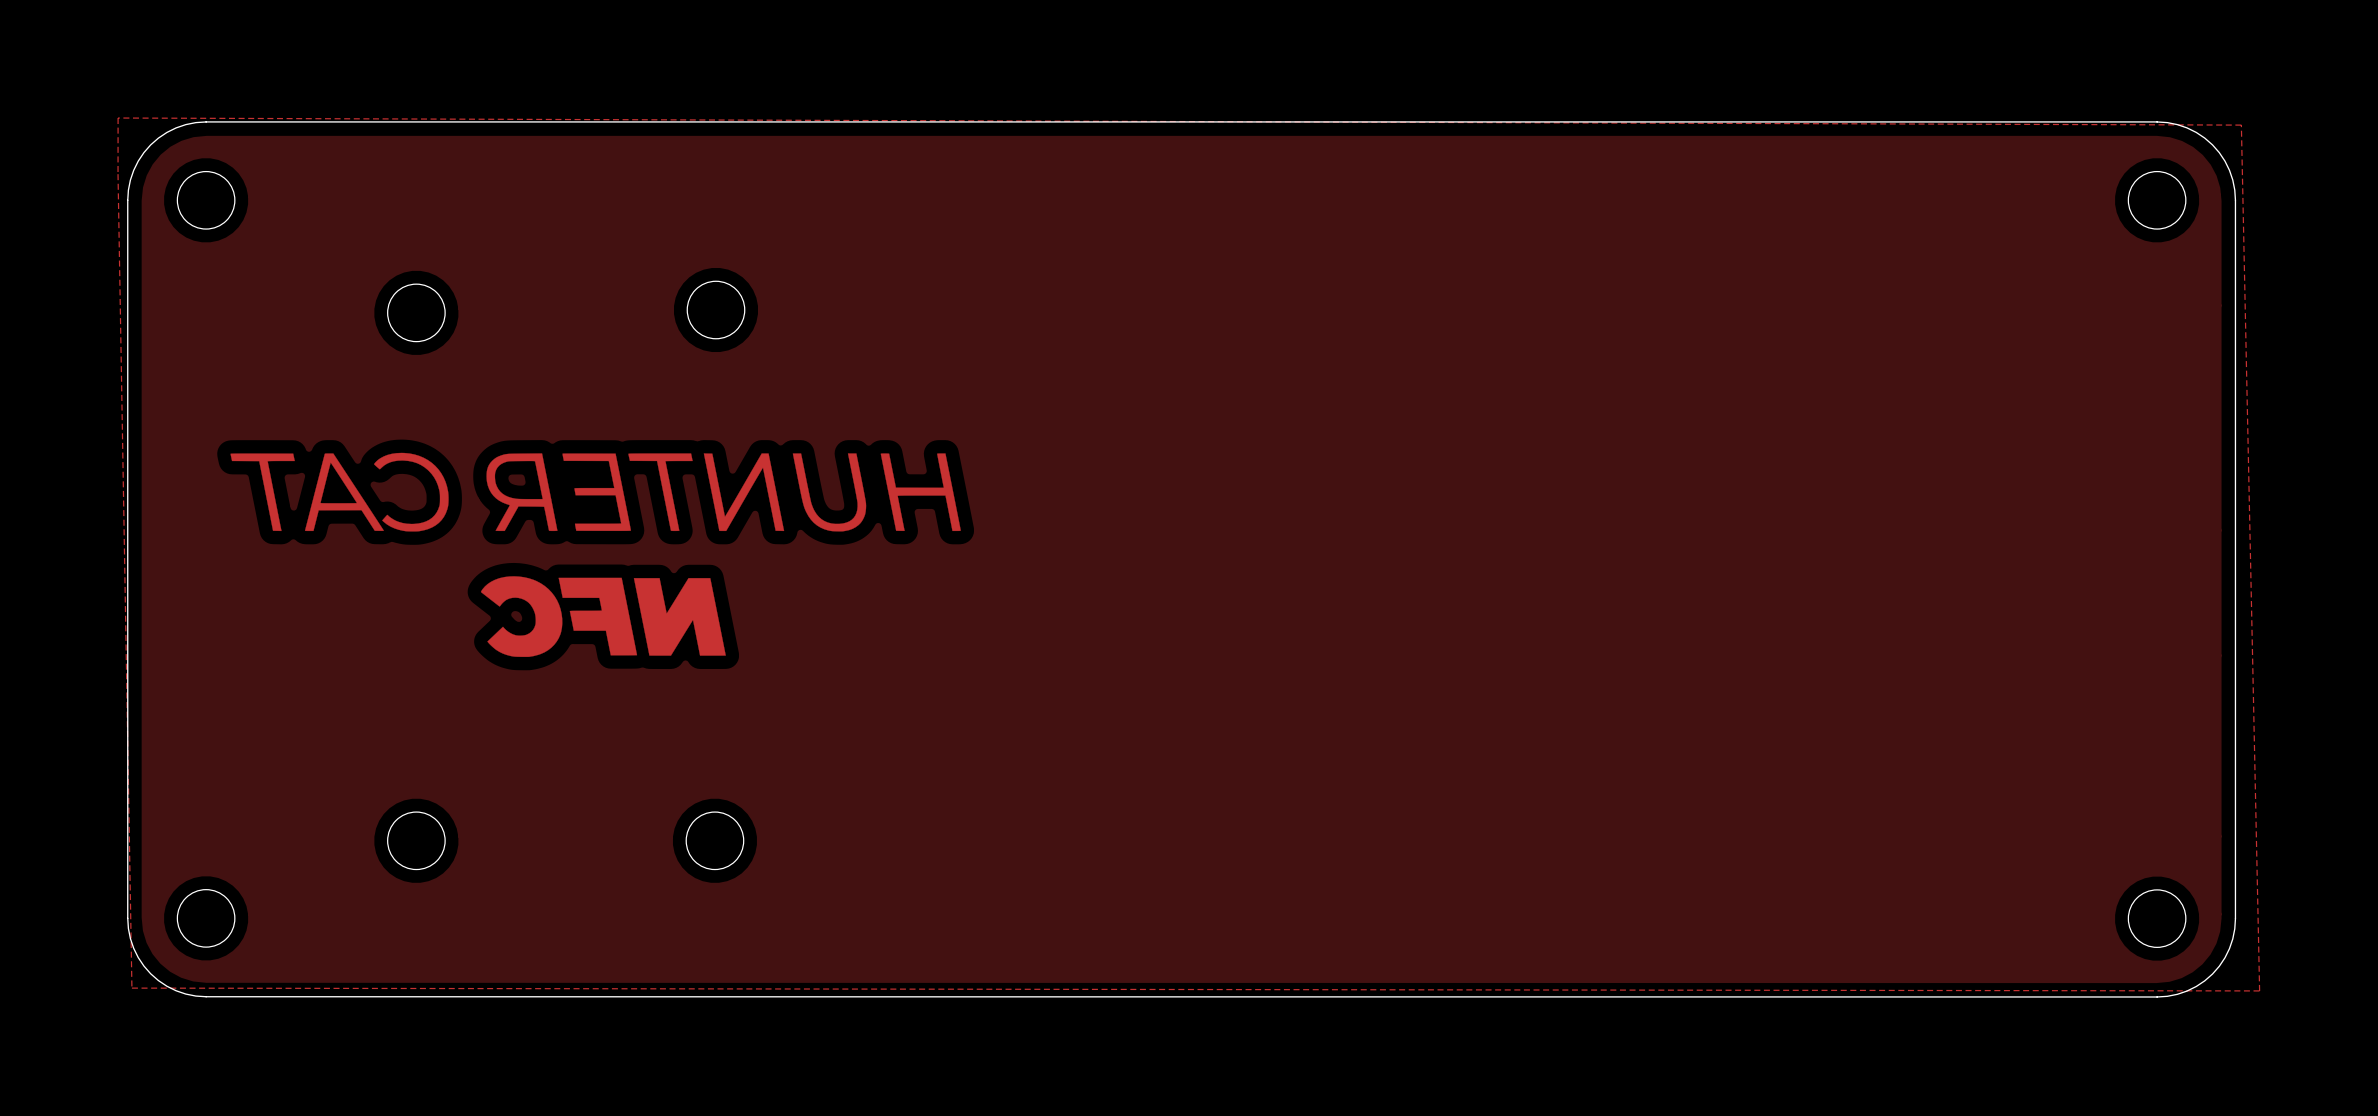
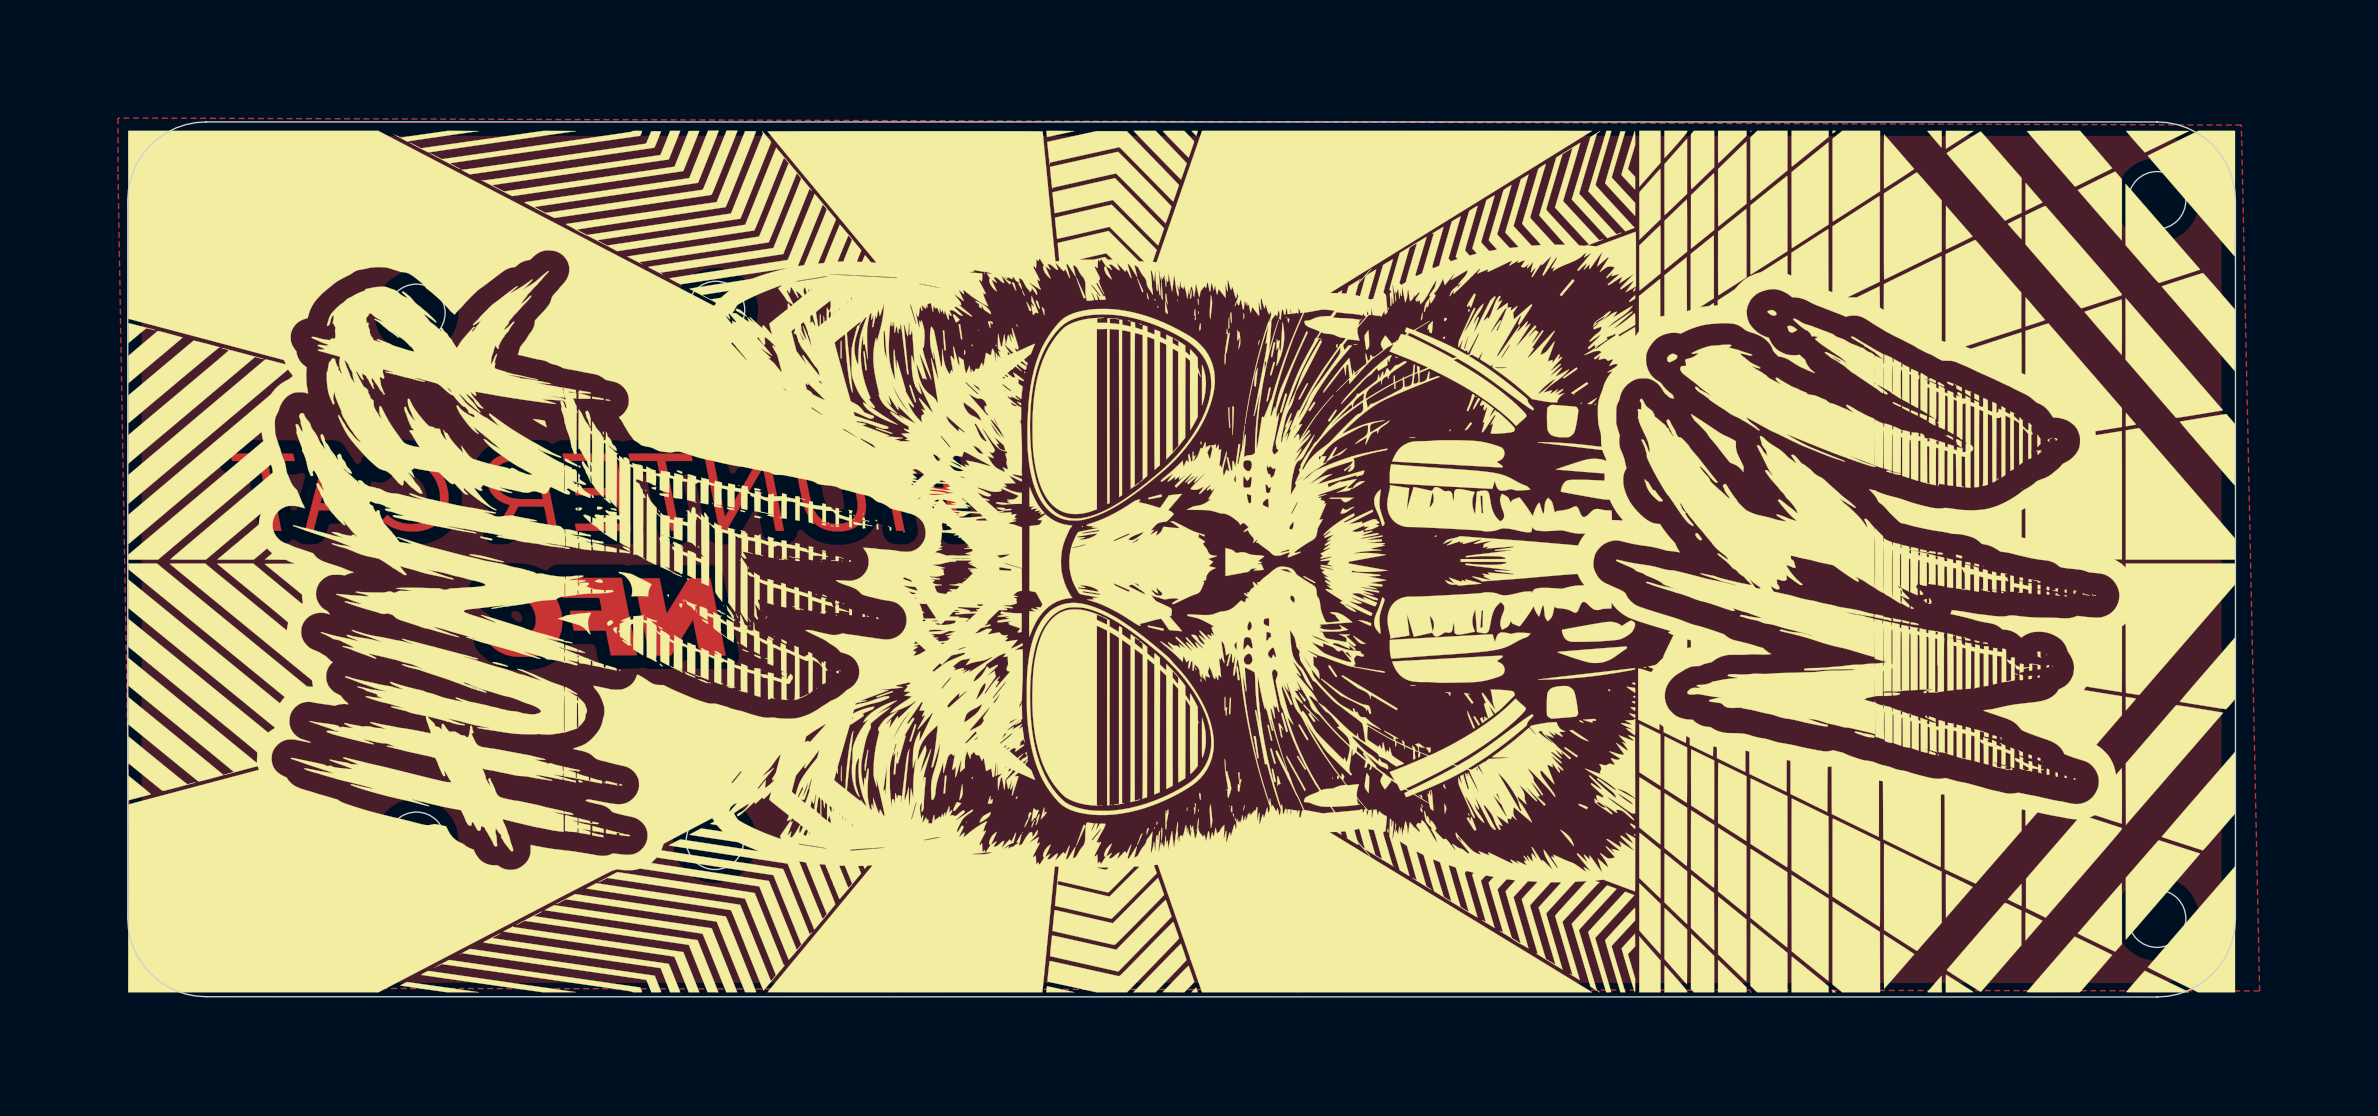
drawing: none -> [128, 130, 2236, 993]

